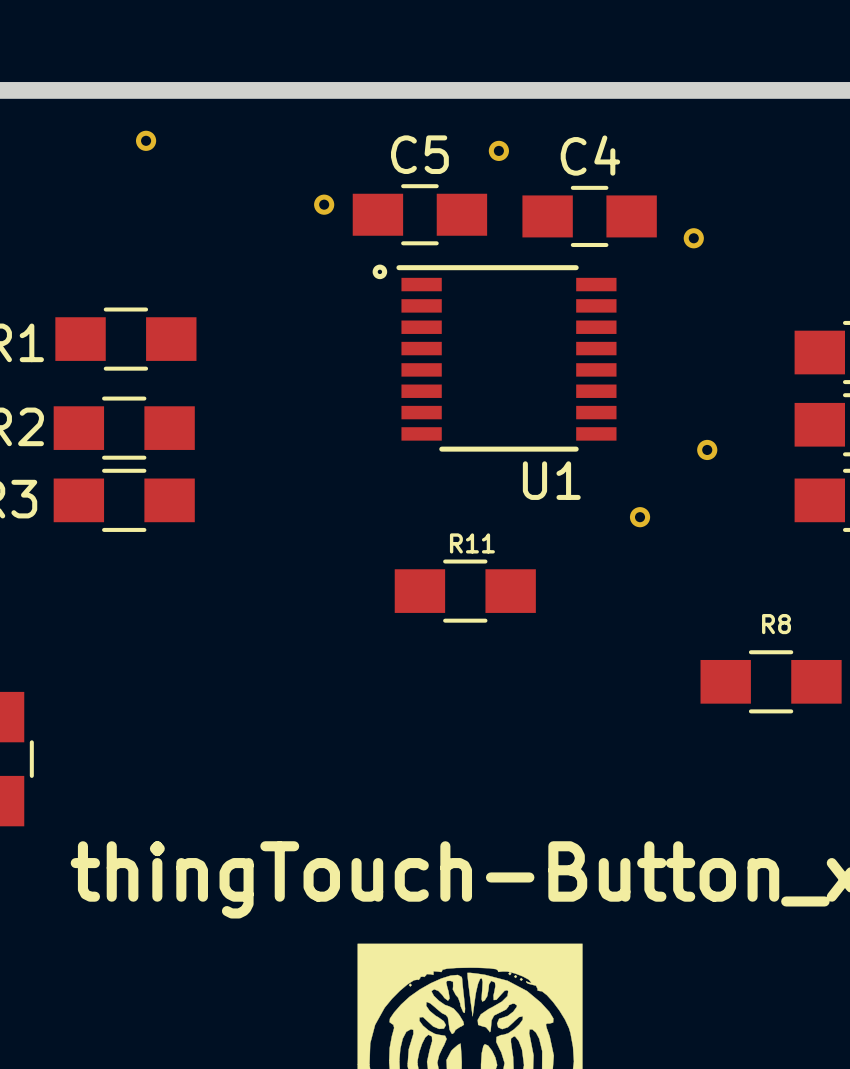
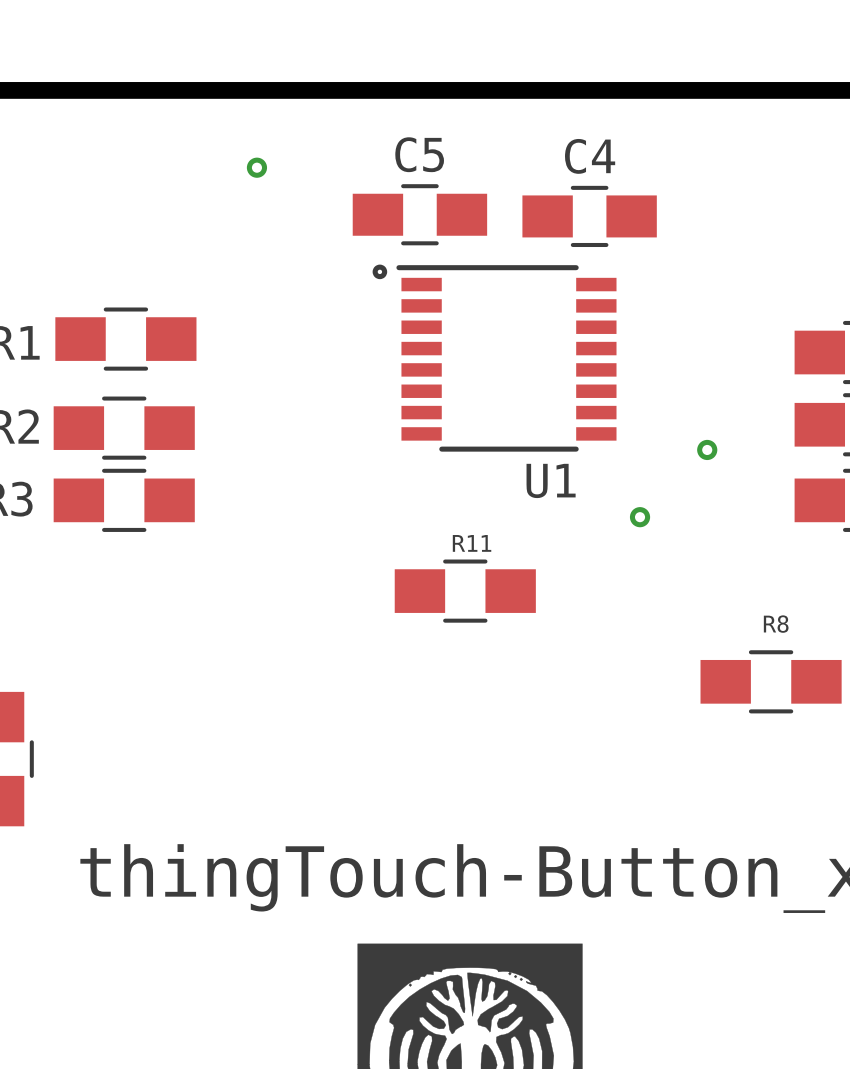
part: (146, 140) -> none
part: (498, 150) -> none
part: none -> (256, 167)
part: (324, 204) -> none
part: (693, 238) -> none

